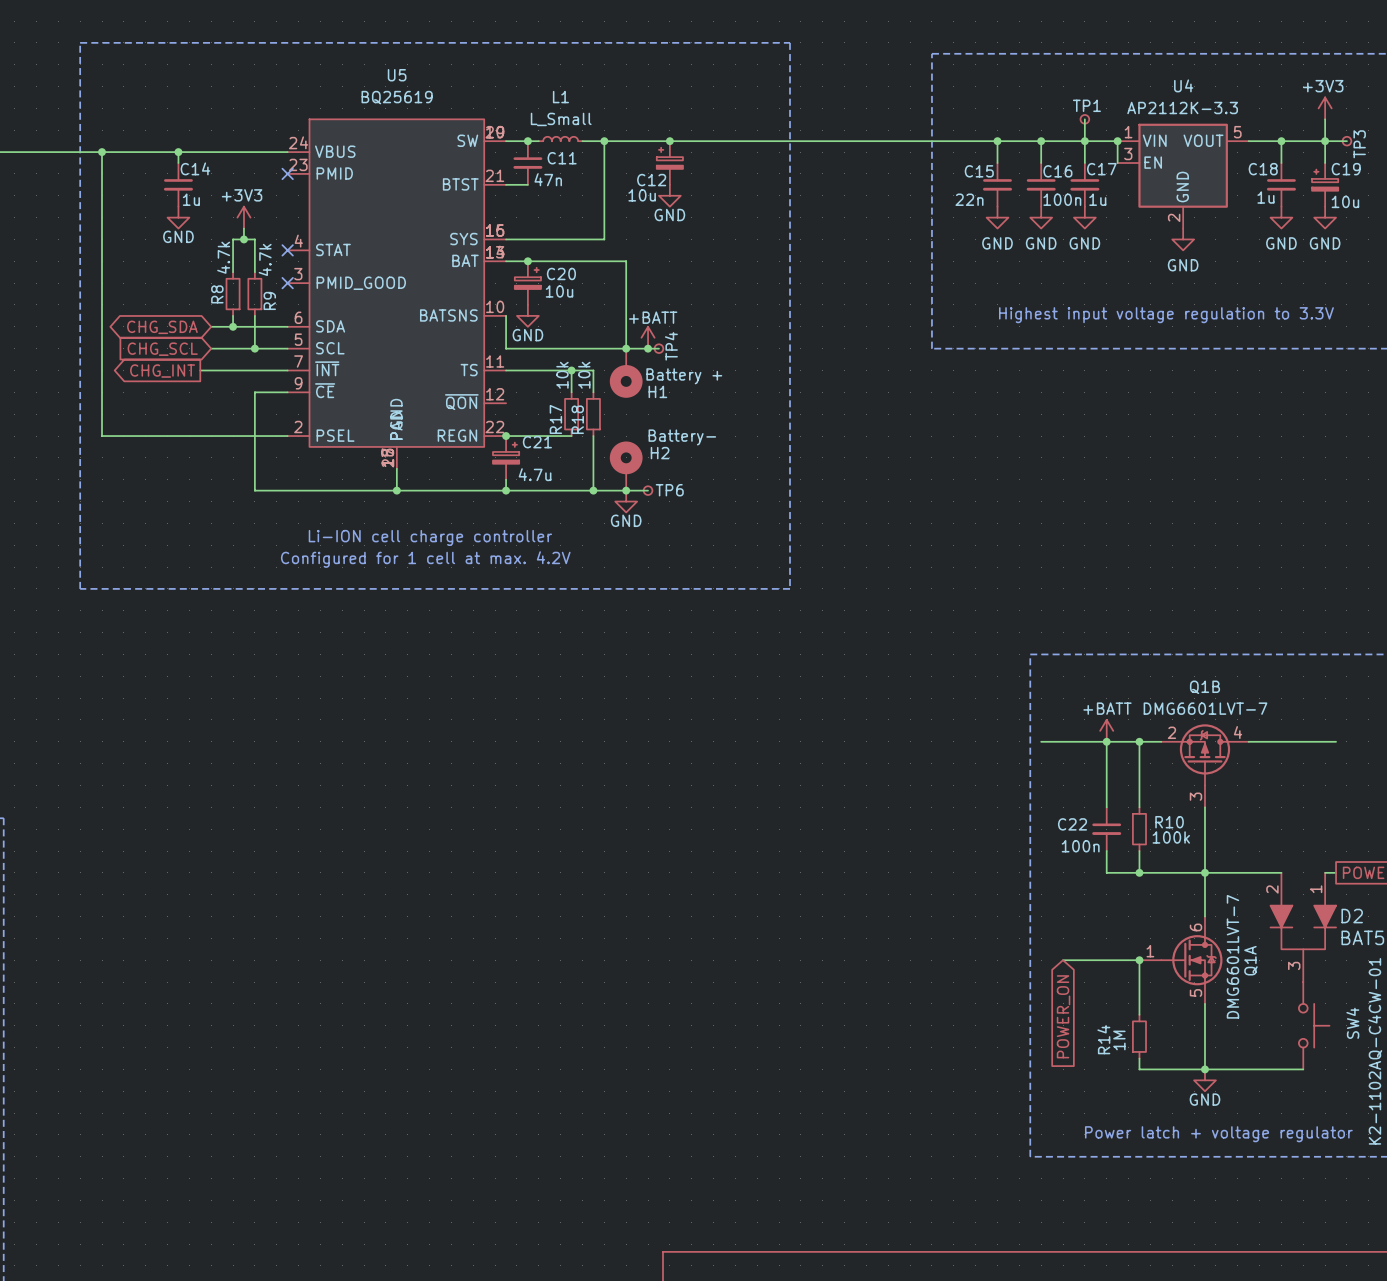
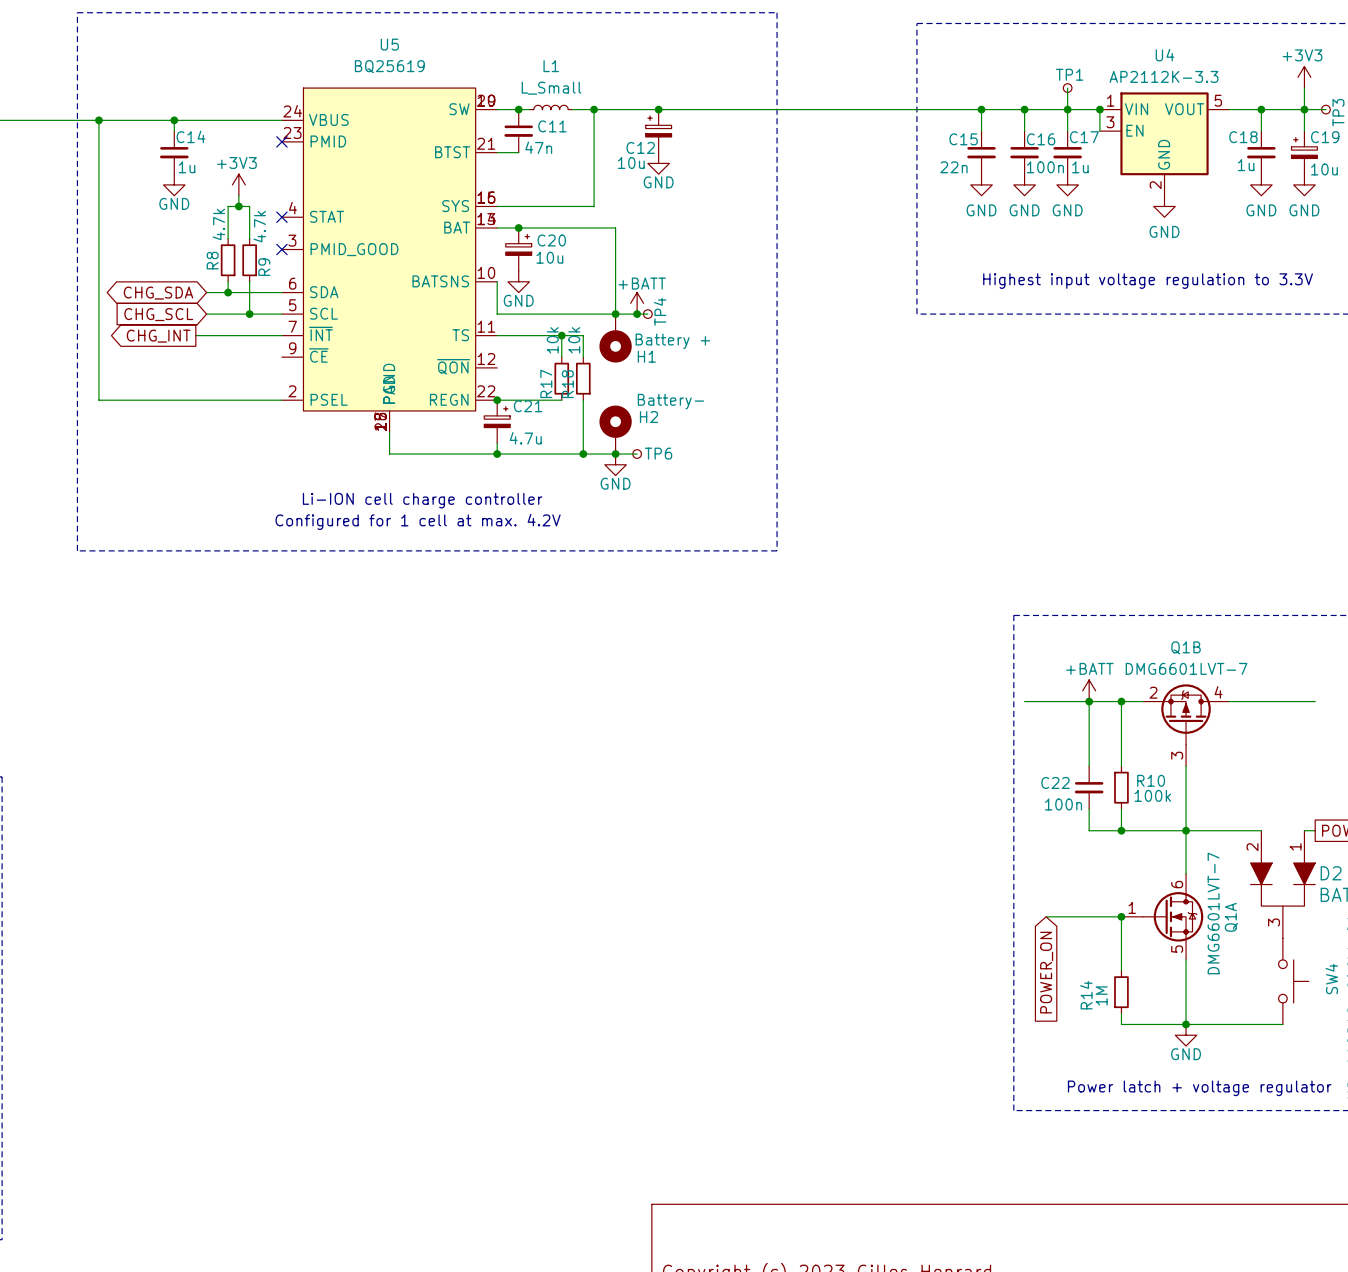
wire: (287, 392) (254, 392) (254, 490) (396, 490) -> none
junction: (396, 490) -> none

